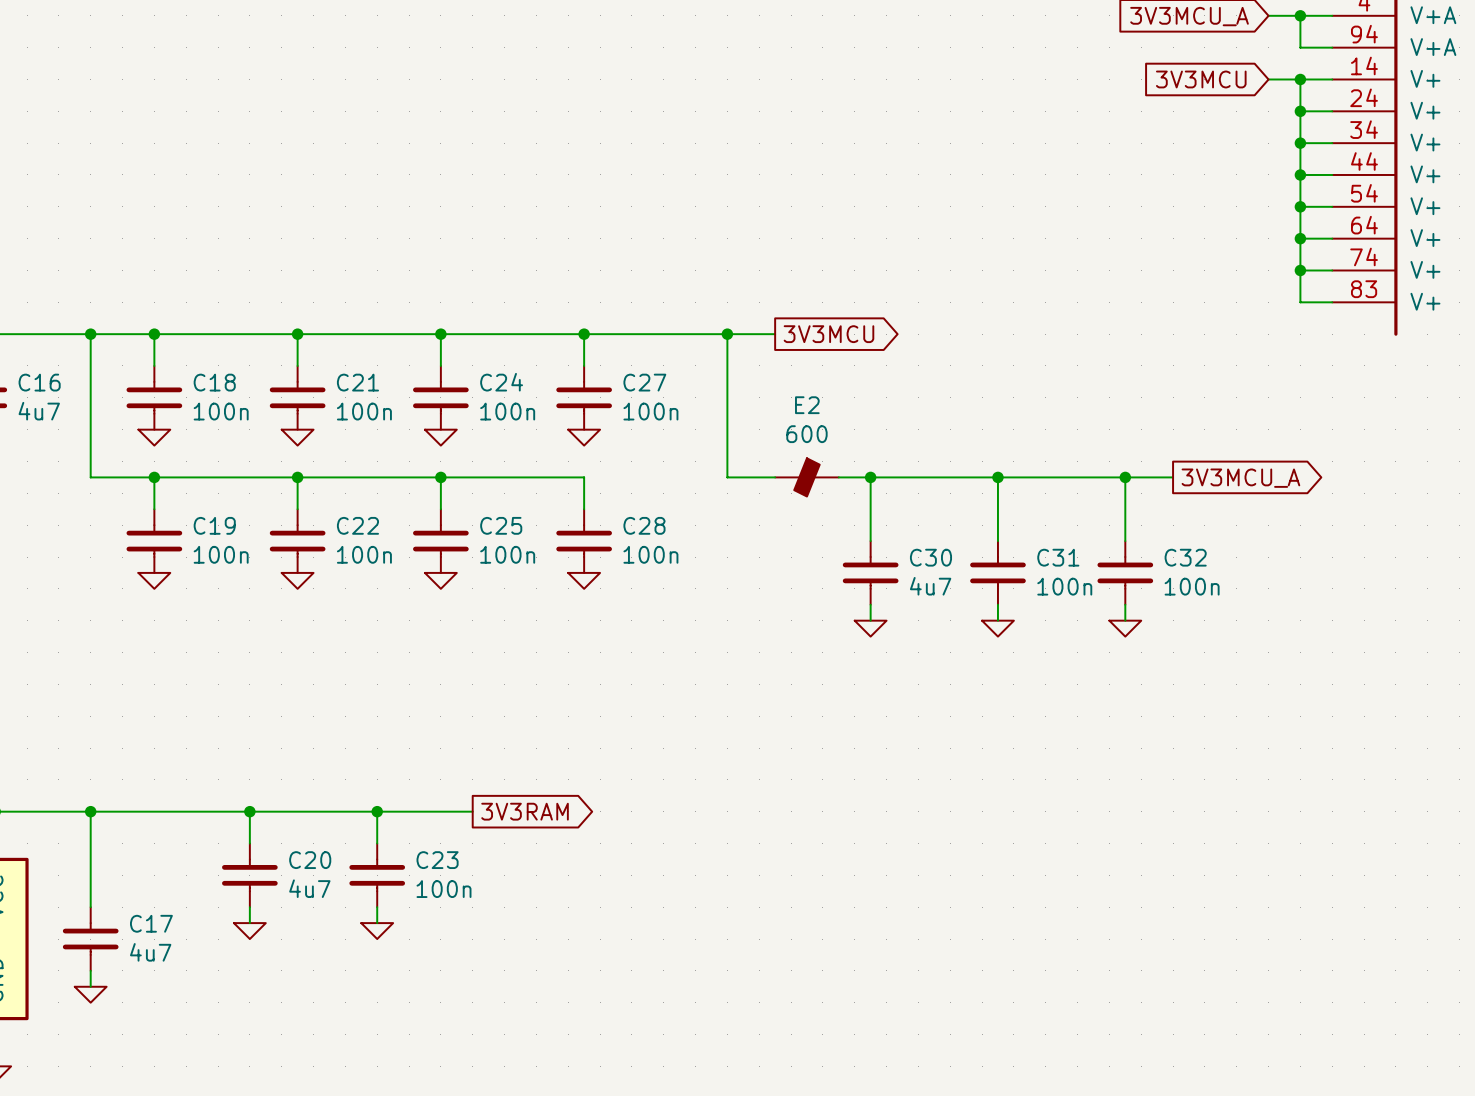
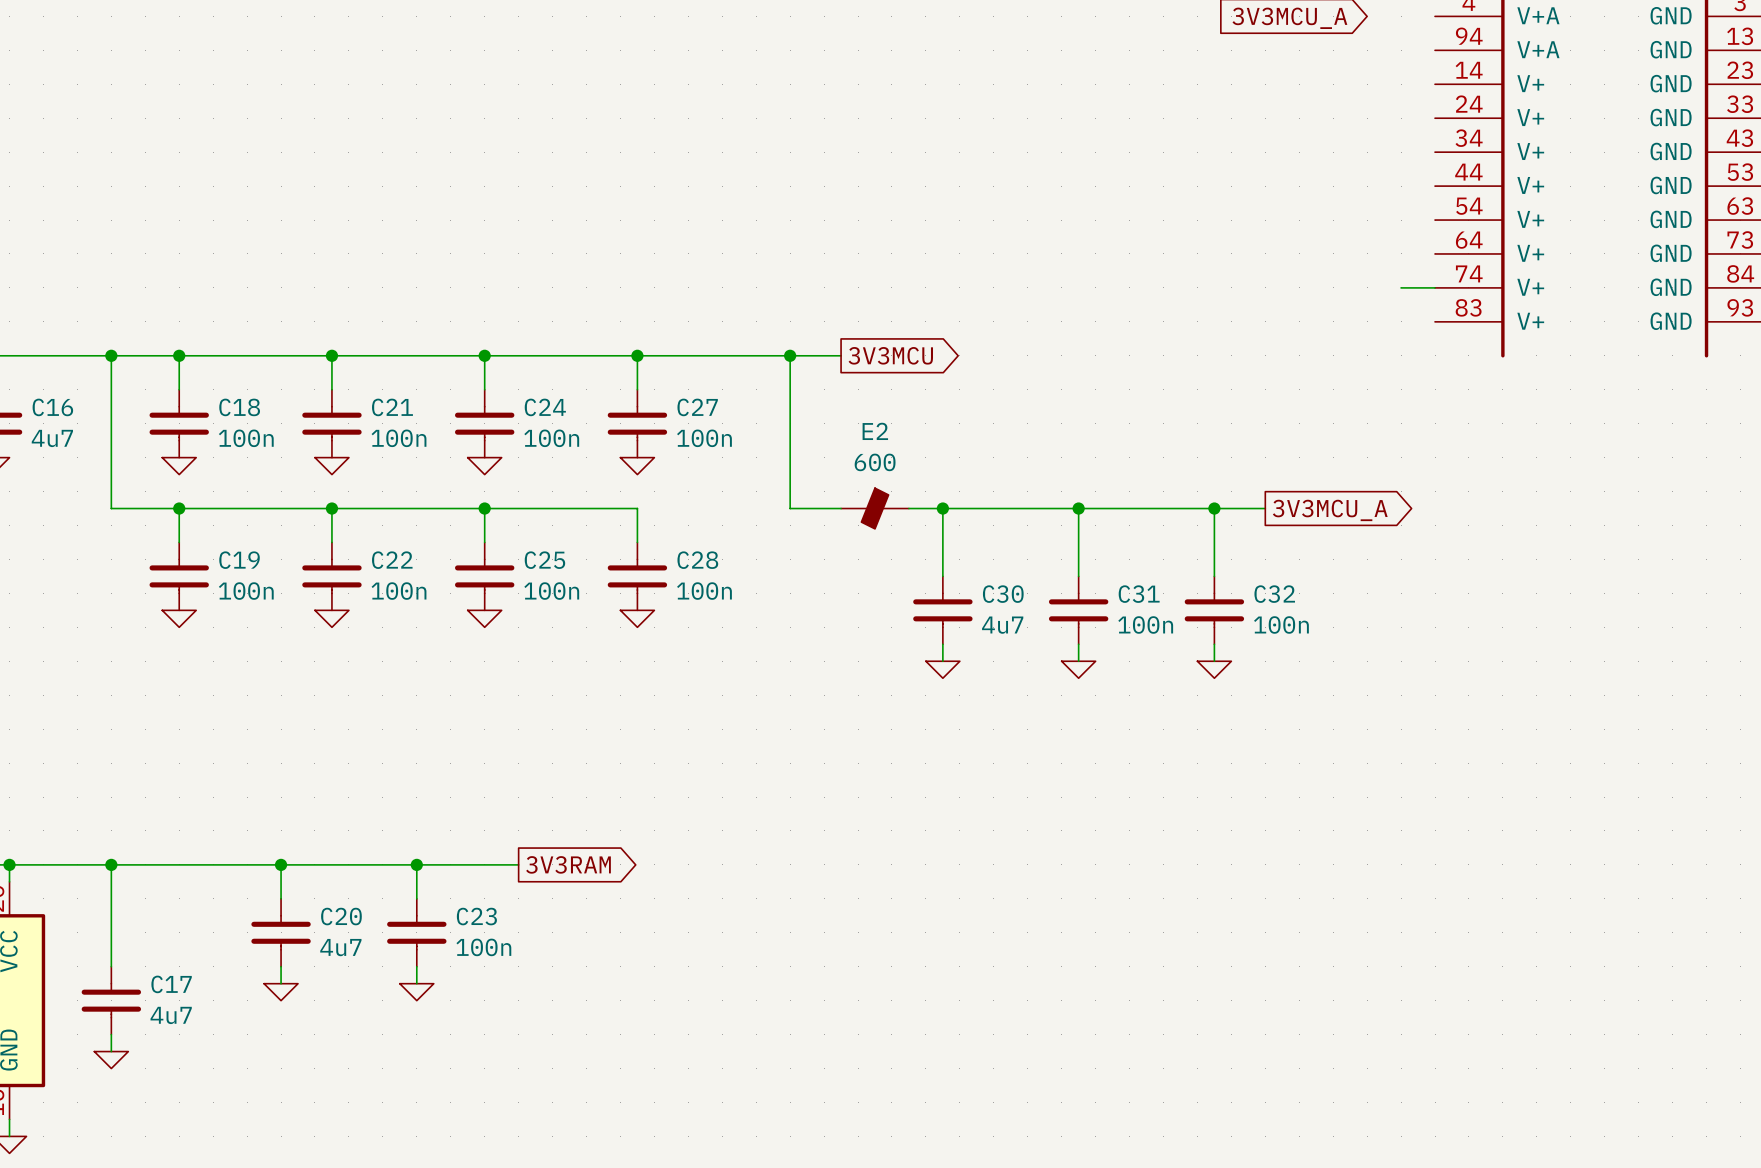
wire: (1268, 15) (1332, 15) -> none
wire: (1300, 15) (1300, 47) (1332, 47) -> none
junction: (1300, 15) -> none
global label: 3V3MCU (1201, 79) -> none
wire: (1268, 79) (1332, 79) -> none
wire: (1300, 79) (1300, 302) (1332, 302) -> none
junction: (1300, 79) -> none
wire: (1300, 111) (1332, 111) -> none
junction: (1300, 111) -> none
wire: (1300, 143) (1332, 143) -> none
junction: (1300, 143) -> none
wire: (1300, 174) (1332, 174) -> none
junction: (1300, 174) -> none
wire: (1300, 206) (1332, 206) -> none
junction: (1300, 206) -> none
wire: (1300, 238) (1332, 238) -> none
junction: (1300, 238) -> none
junction: (1300, 270) -> none

